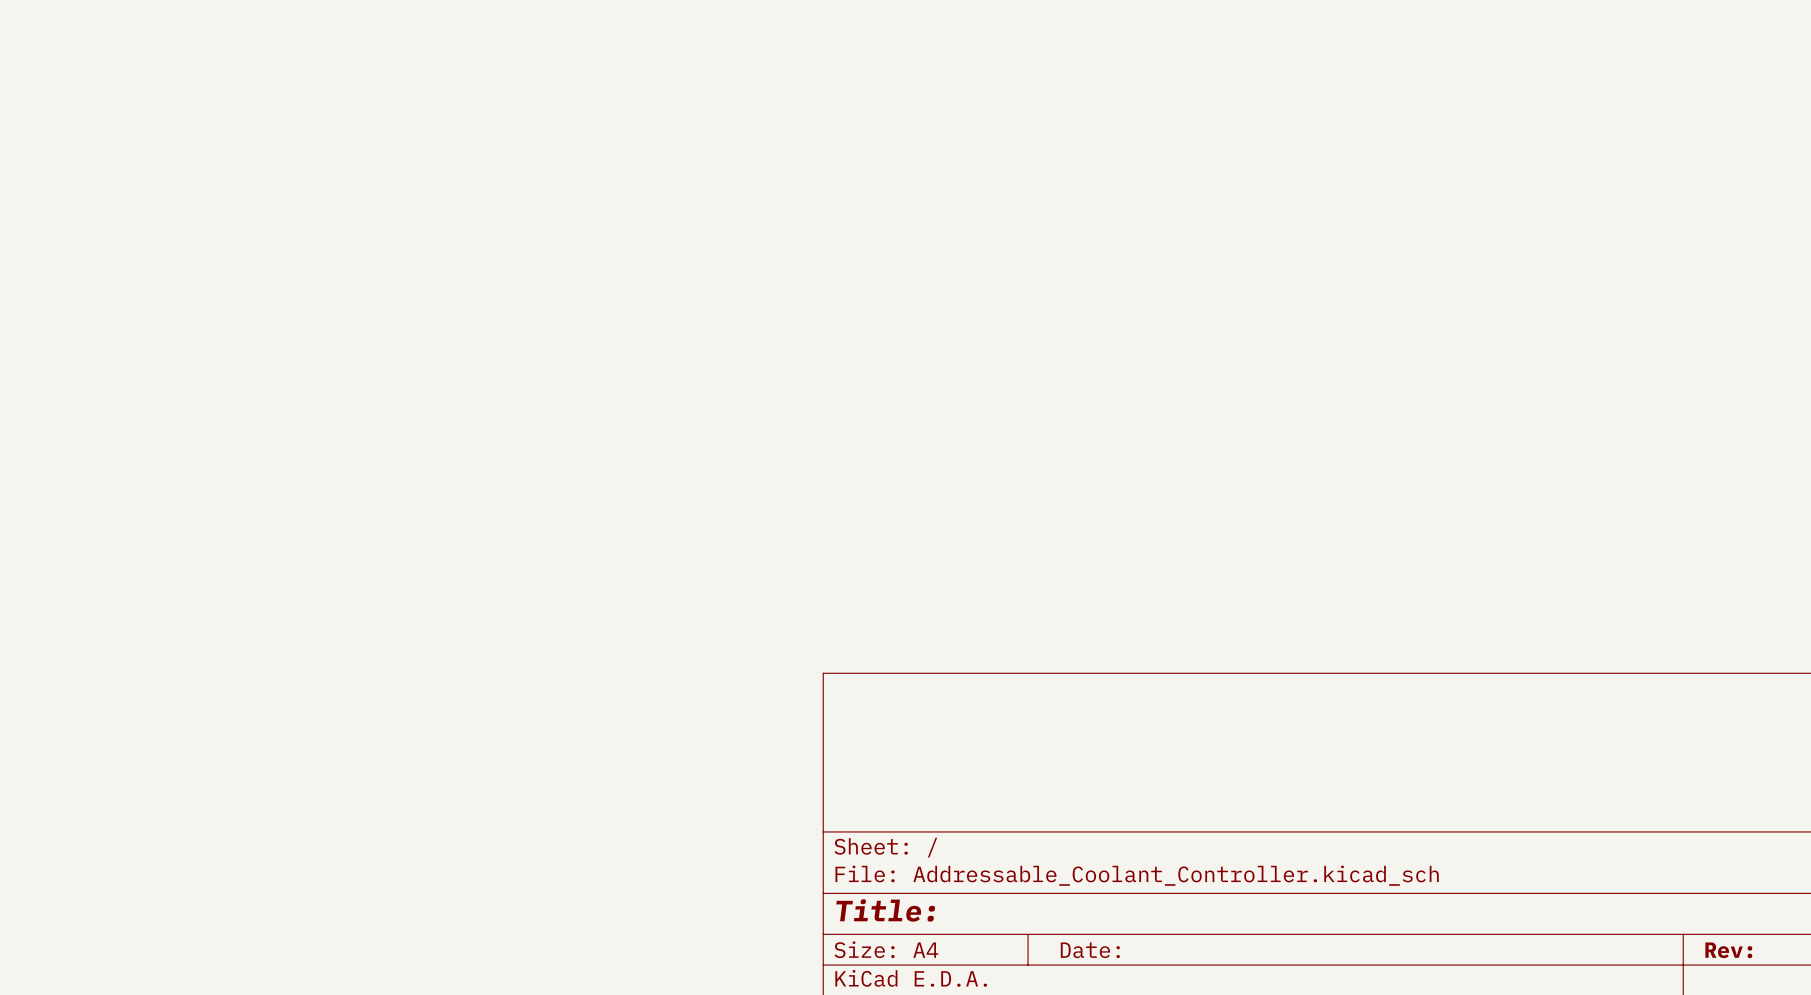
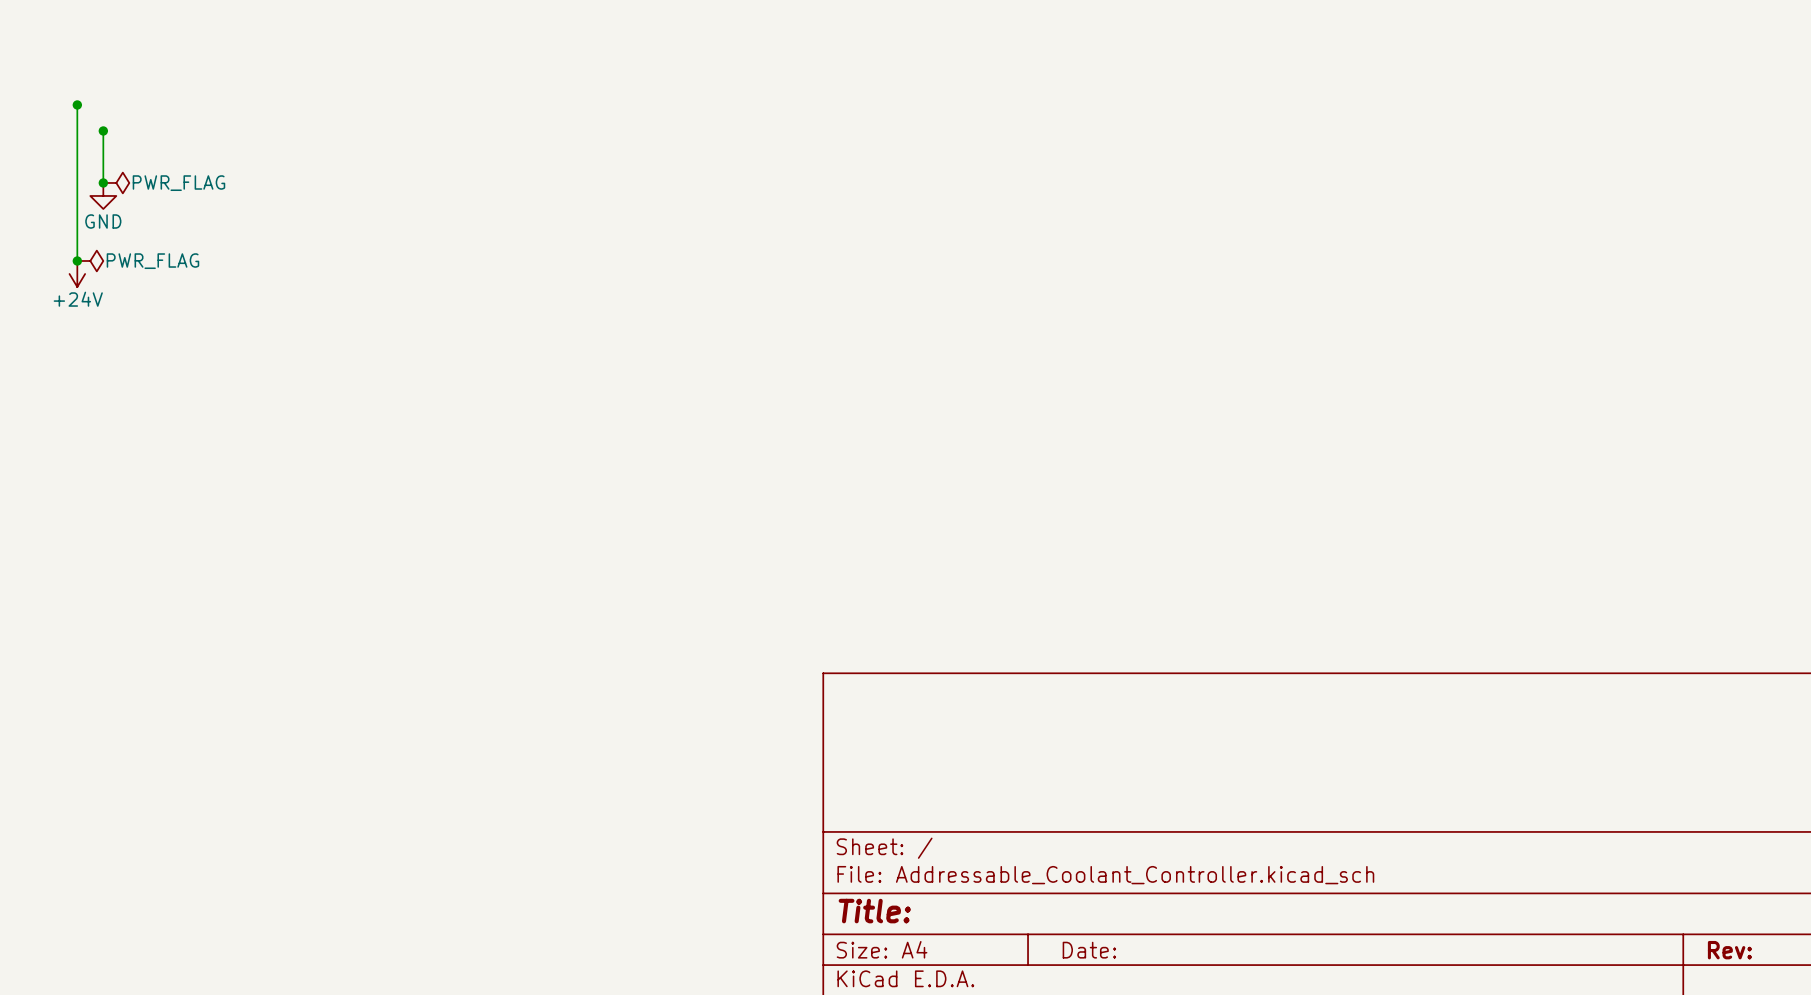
wire: none -> (77, 104) (77, 261)
junction: none -> (77, 104)
wire: none -> (103, 130) (103, 182)
junction: none -> (103, 130)
junction: none -> (103, 182)
power symbol: none -> PWR_FLAG (116, 182)
power symbol: none -> GND (103, 195)
junction: none -> (77, 261)
power symbol: none -> PWR_FLAG (90, 261)
power symbol: none -> +24V (77, 274)

